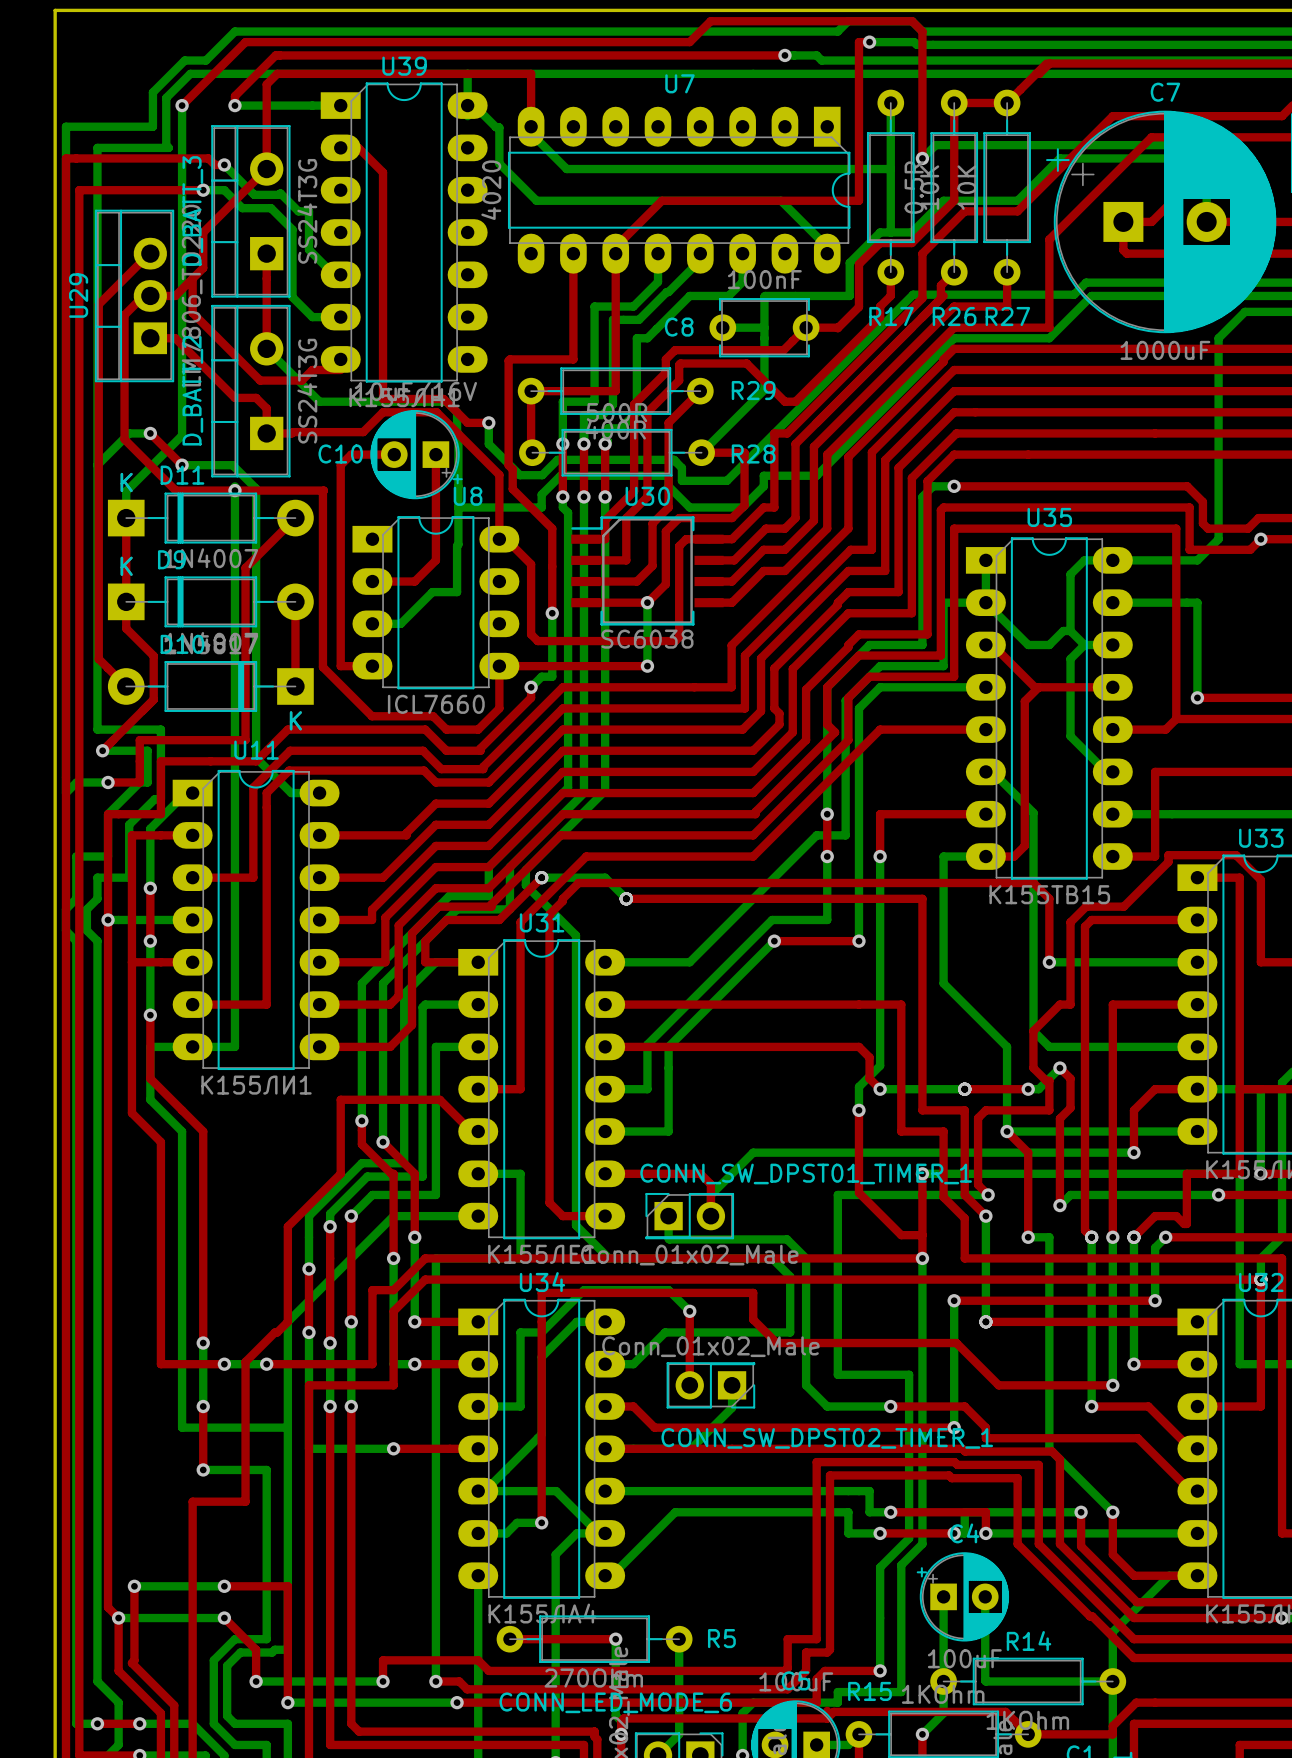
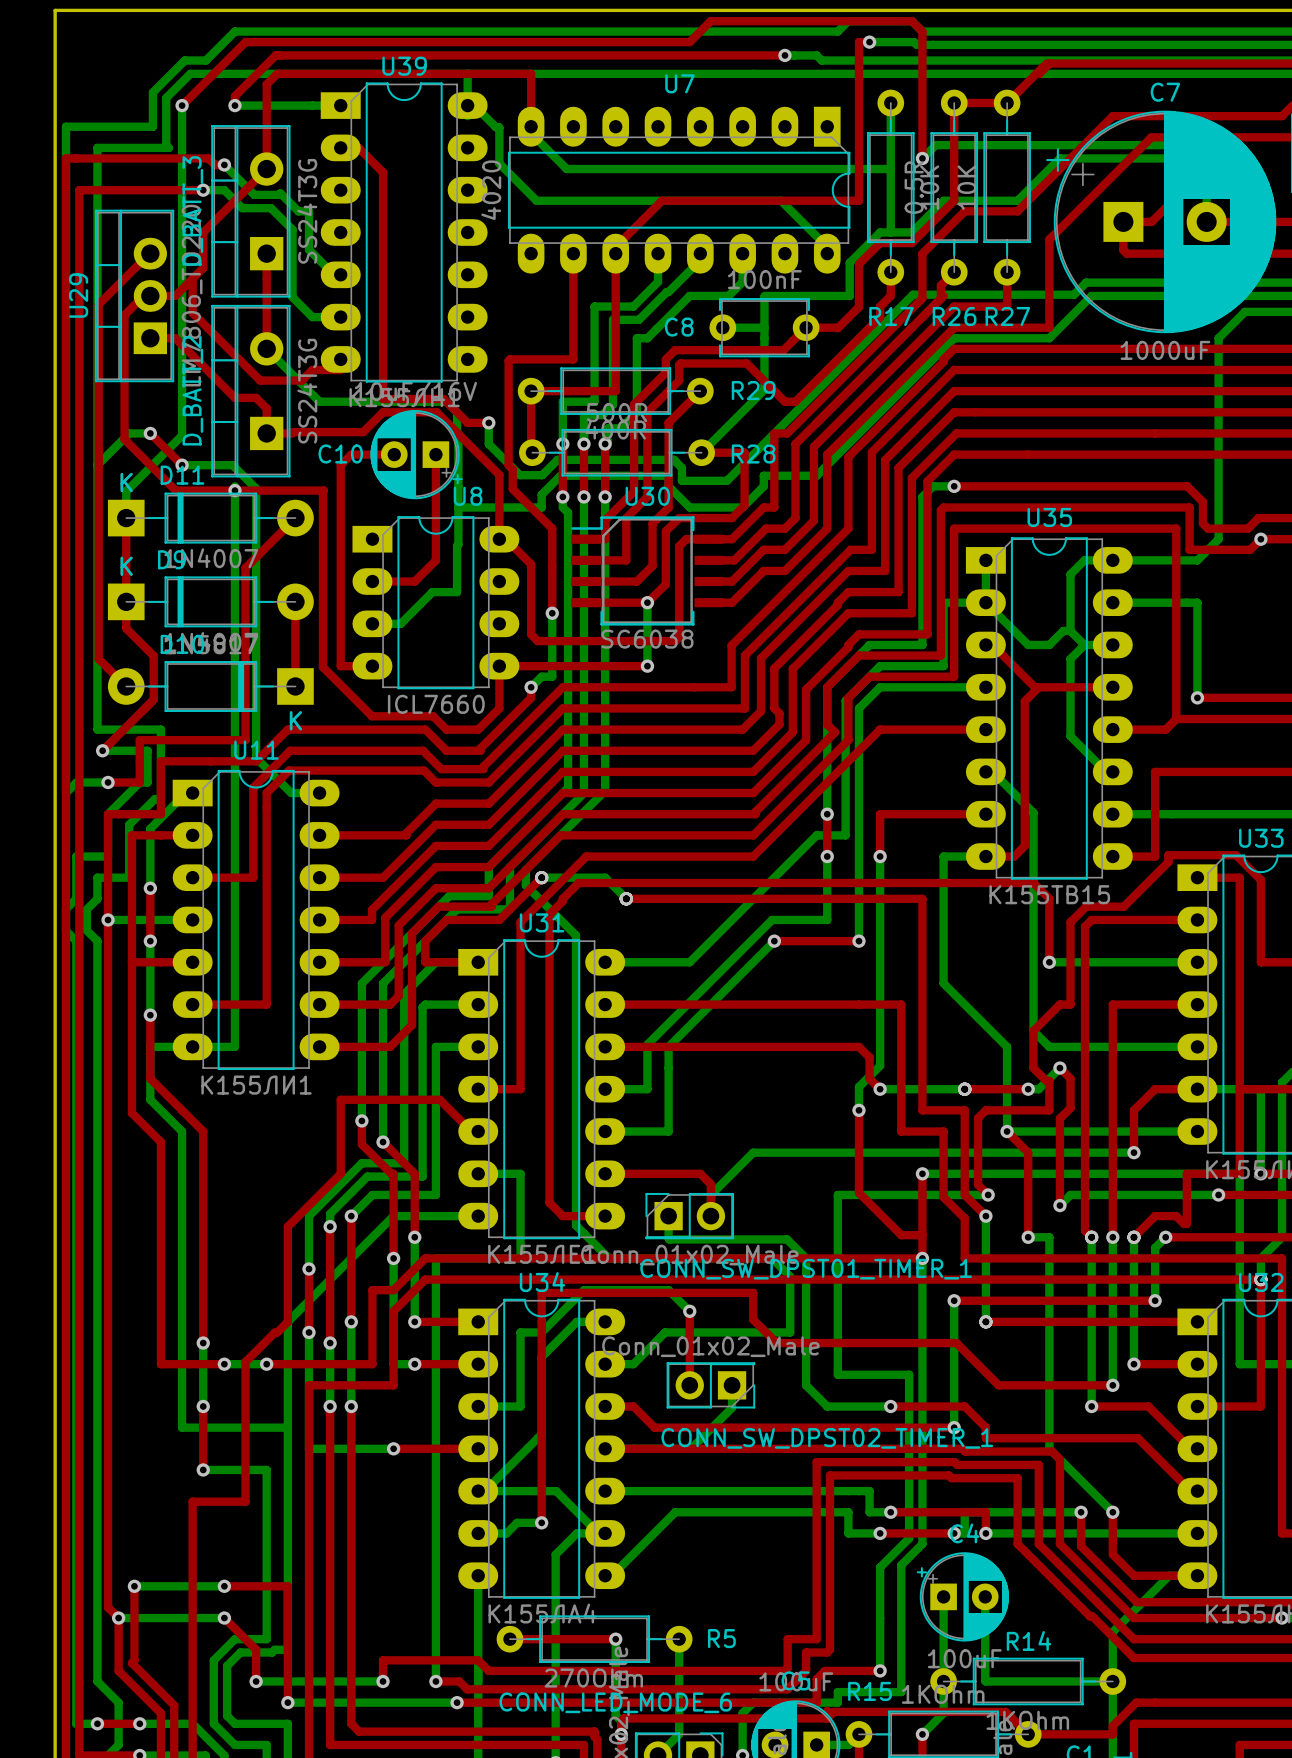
CONN_SW_DPST01_TIMER_1 name position: CONN_SW_DPST01_TIMER_1 (806, 1173) -> CONN_SW_DPST01_TIMER_1 (806, 1269)

